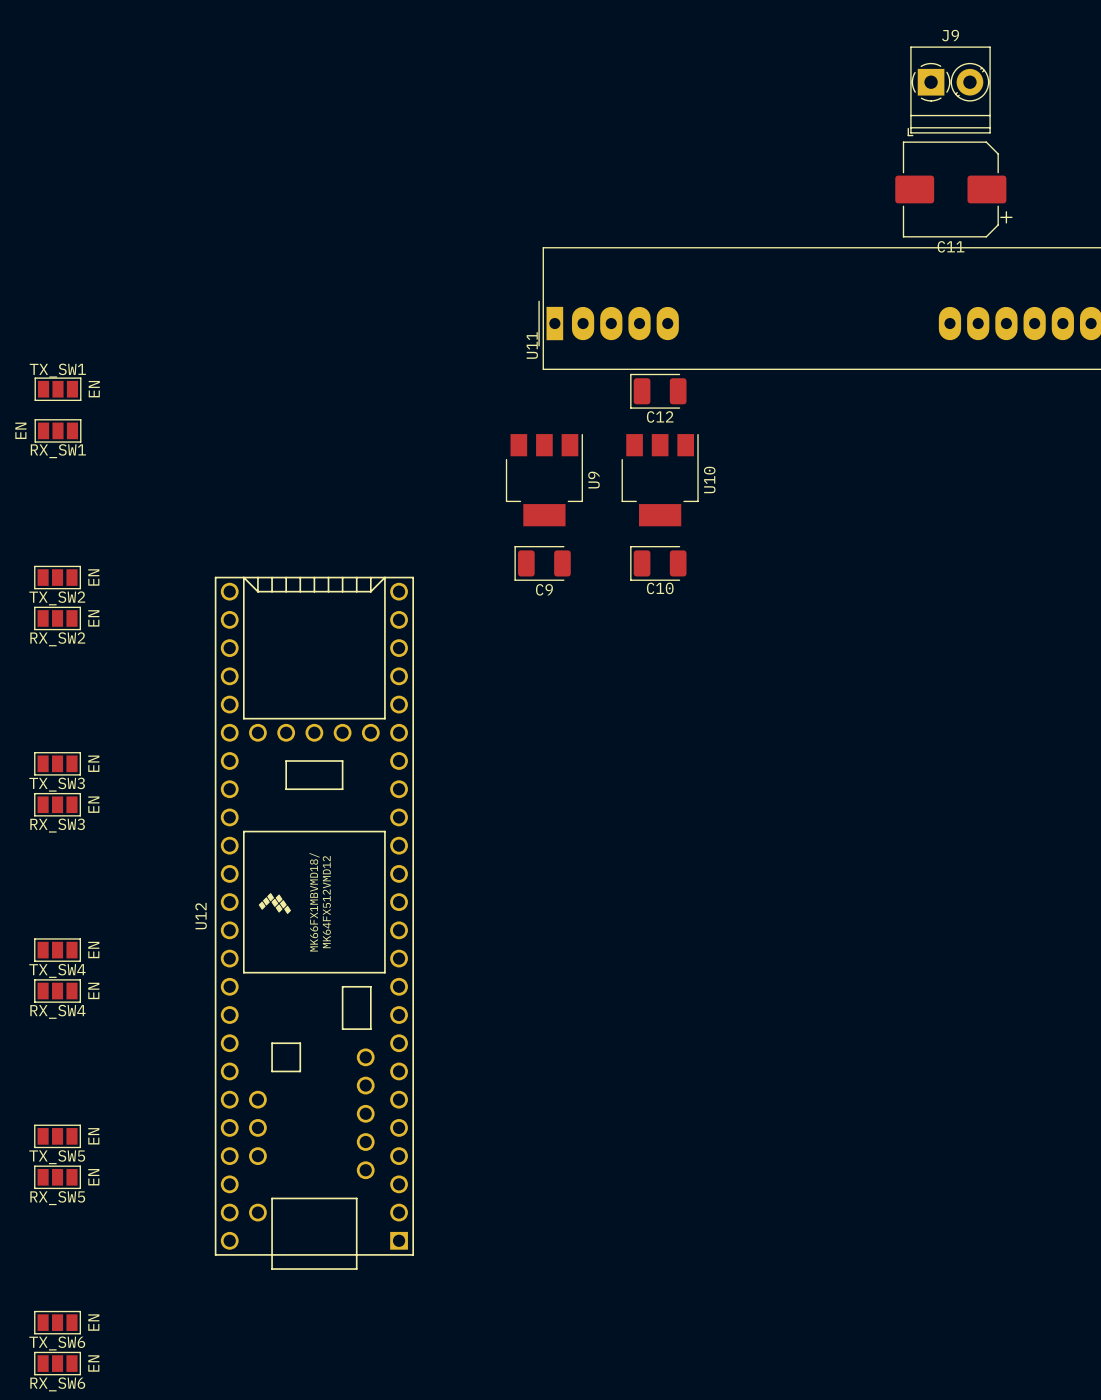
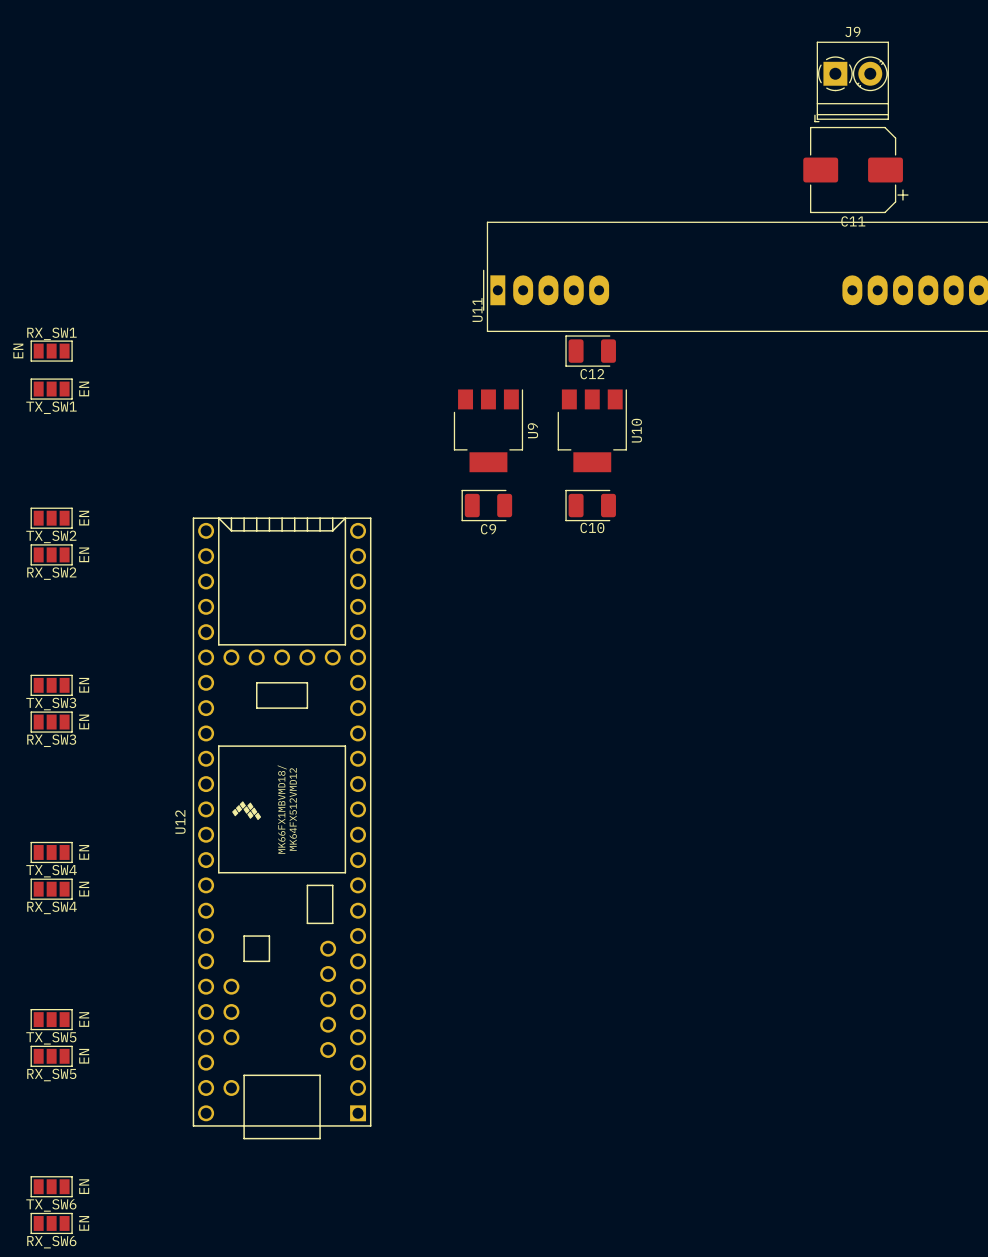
TX_SW1 name position: TX_SW1 (57, 370) -> TX_SW1 (51, 407)
TX_SW1 position: (57, 389) -> (51, 389)
RX_SW1 position: (57, 430) -> (51, 351)
RX_SW1 name position: RX_SW1 (58, 451) -> RX_SW1 (51, 333)

